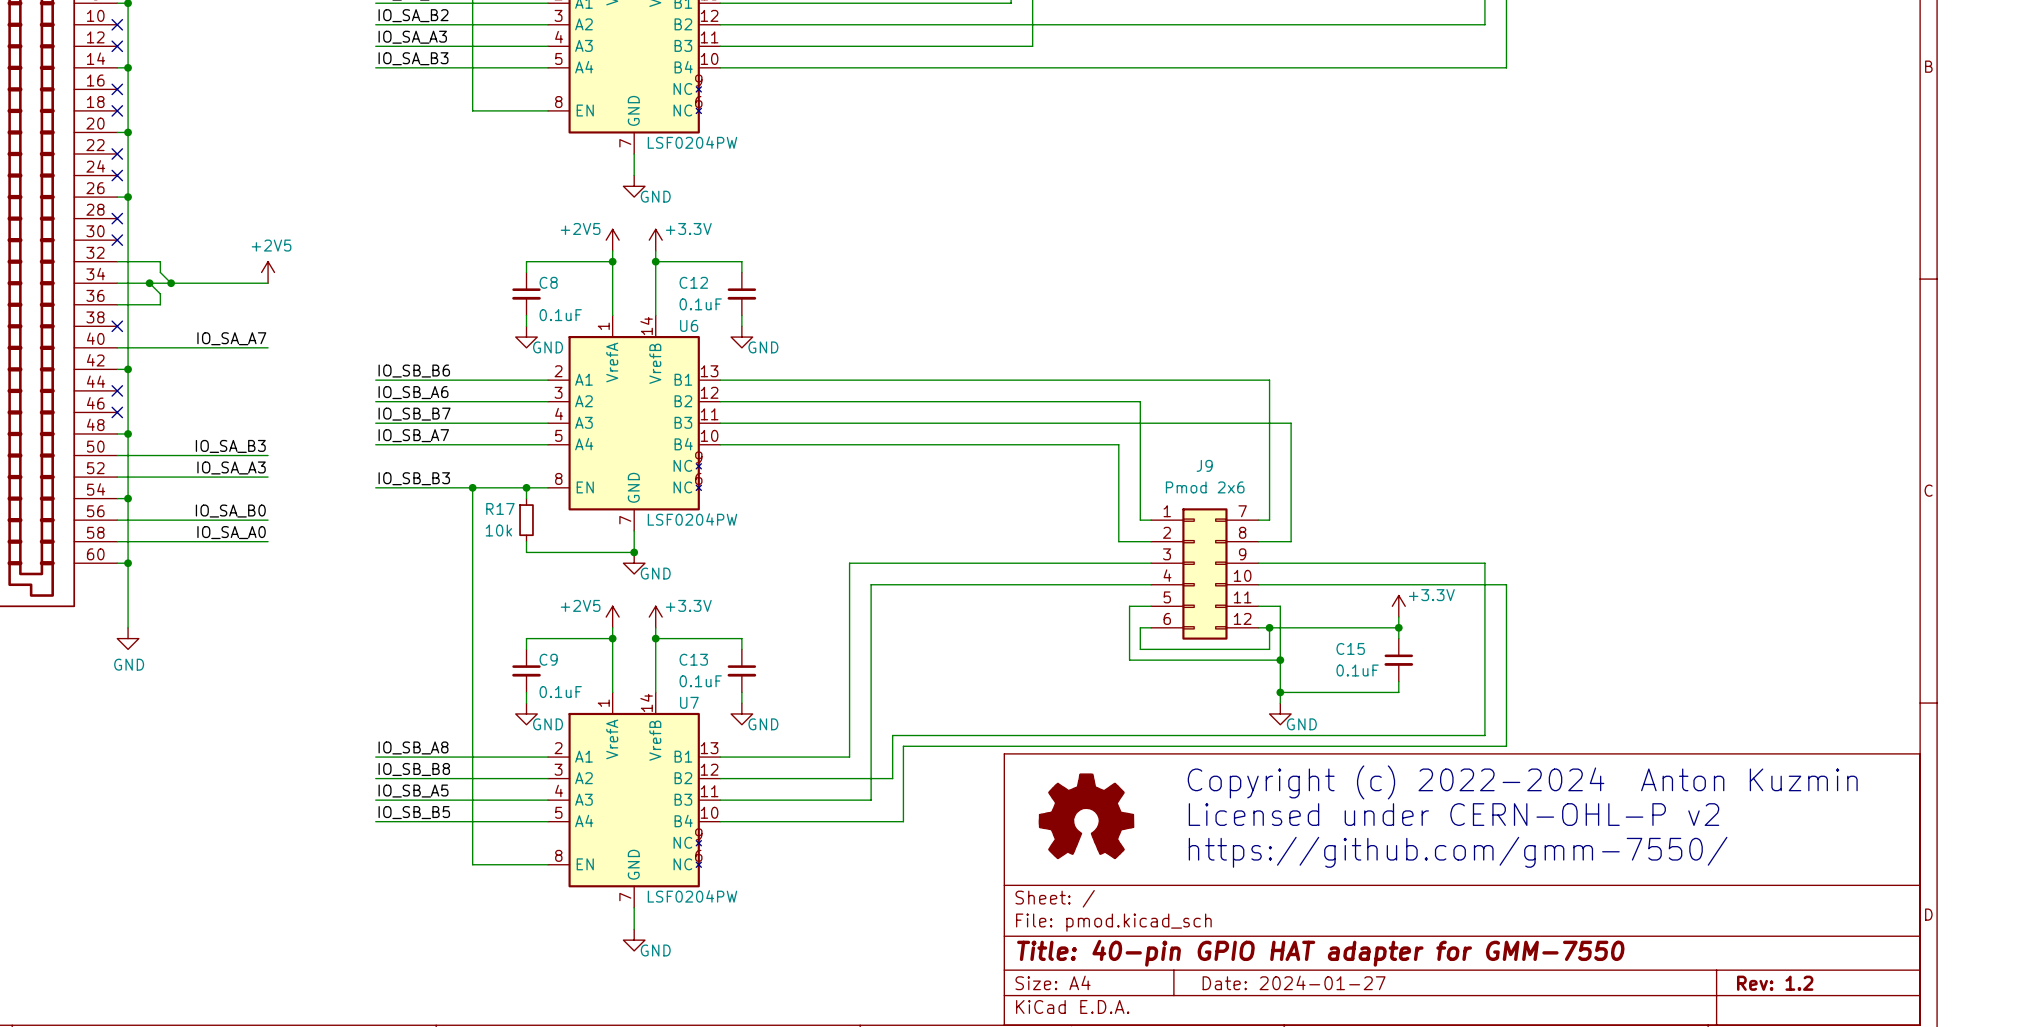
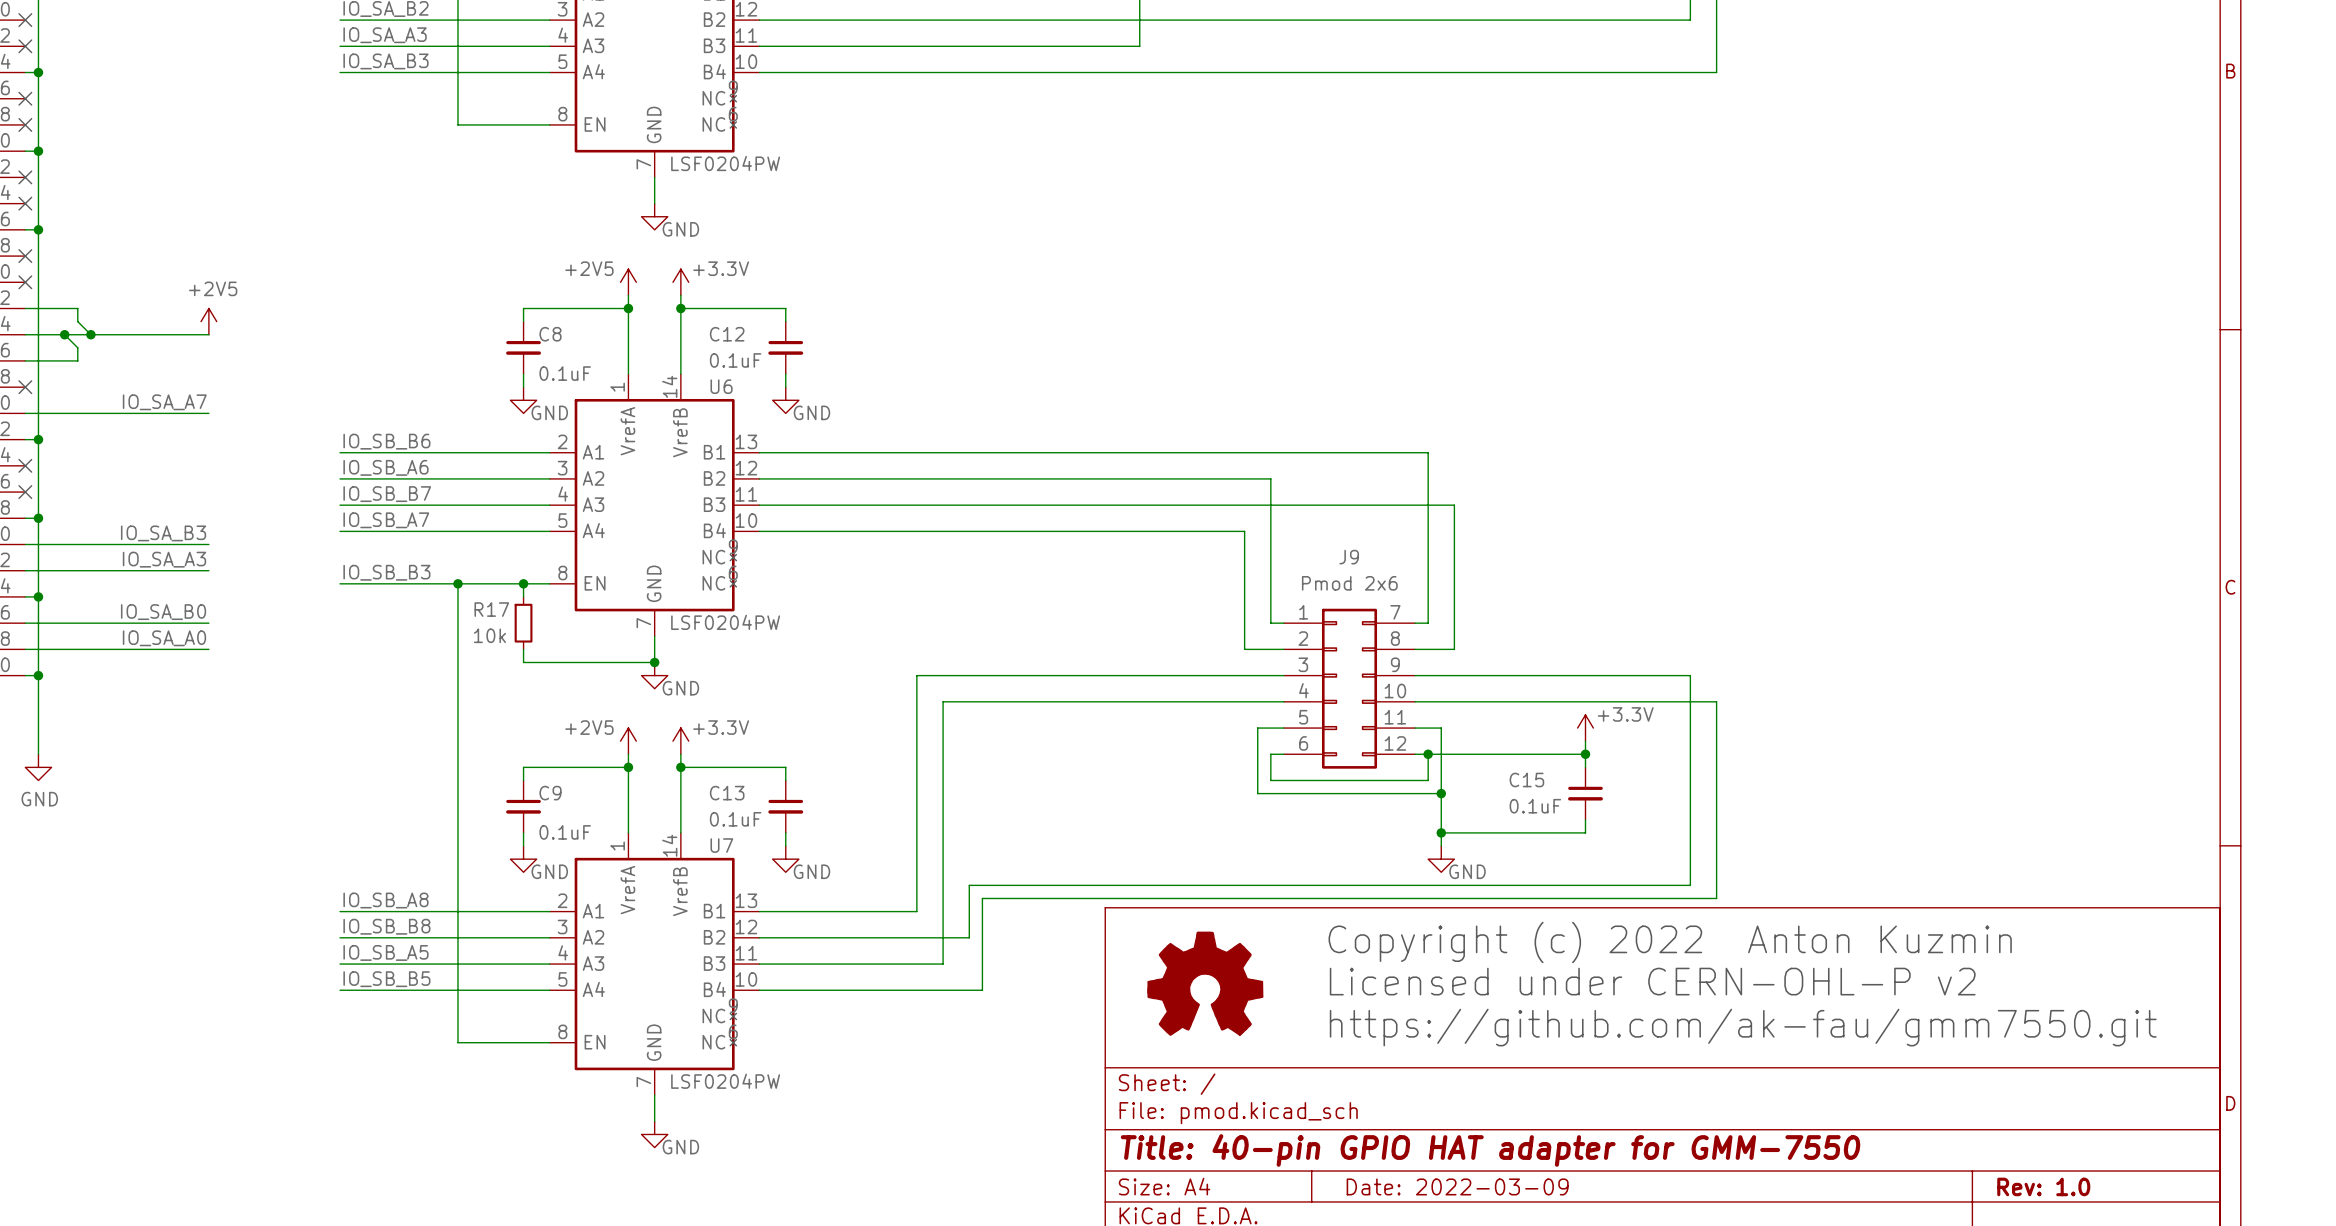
text: Copyright (c) 2022-2024 Anton Kuzmin (1522, 782) -> Copyright (c) 2022 Anton Kuzmin (1670, 942)
text: https://github.com/gmm-7550/ (1458, 852) -> https://github.com/ak-fau/gmm7550.git (1743, 1027)
title block: Date: 2024-01-27 (1294, 982) -> Date: 2022-03-09 (1457, 1186)
title block: Rev: 1.2 (1775, 983) -> Rev: 1.0 (2043, 1186)

